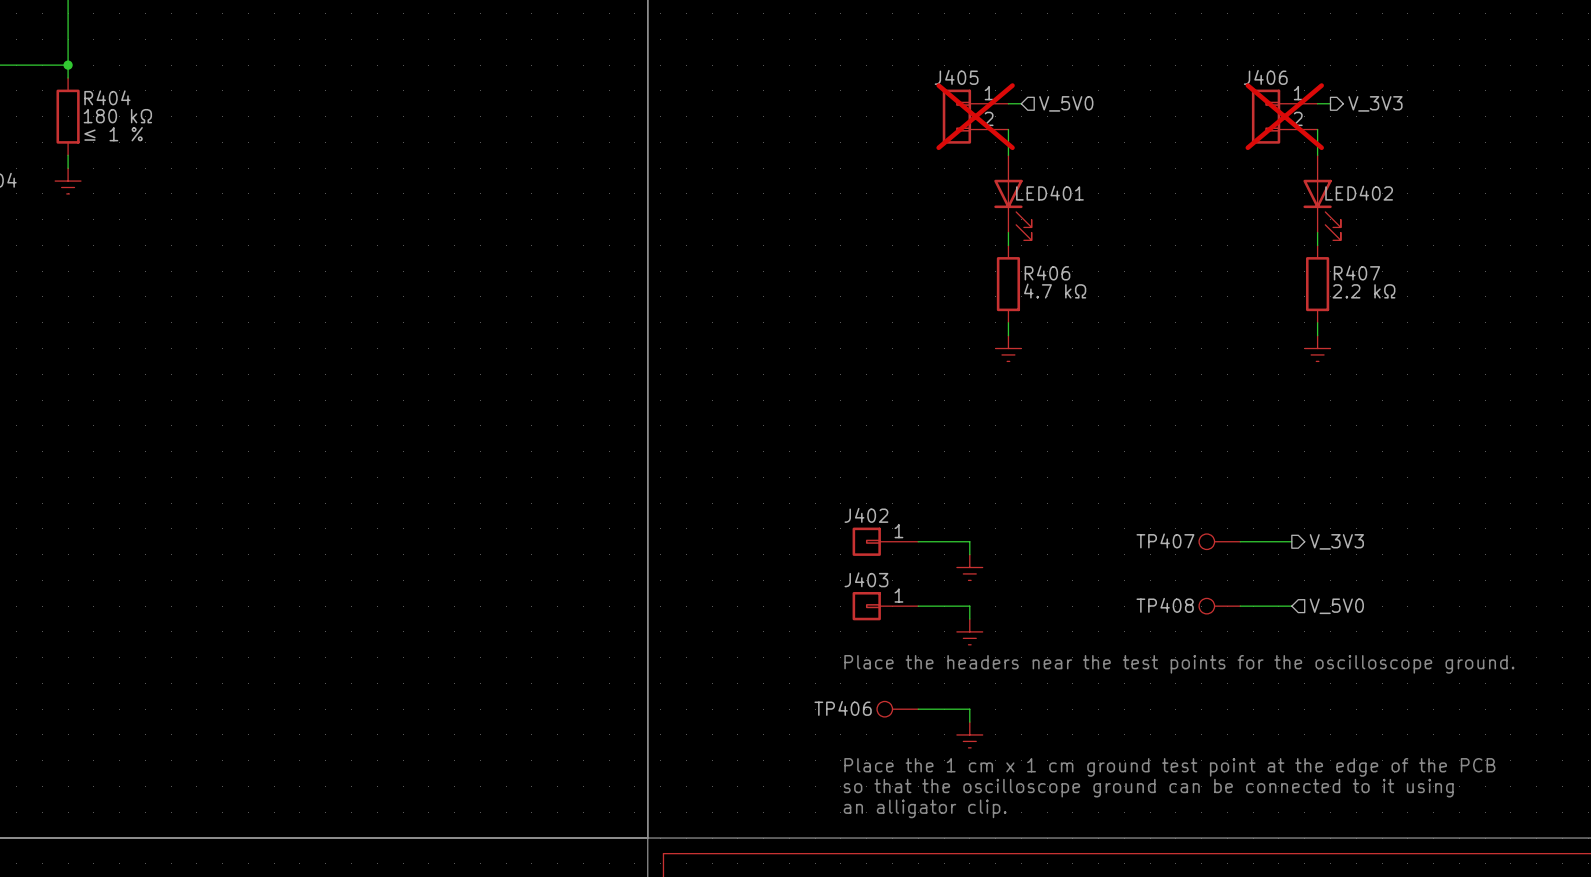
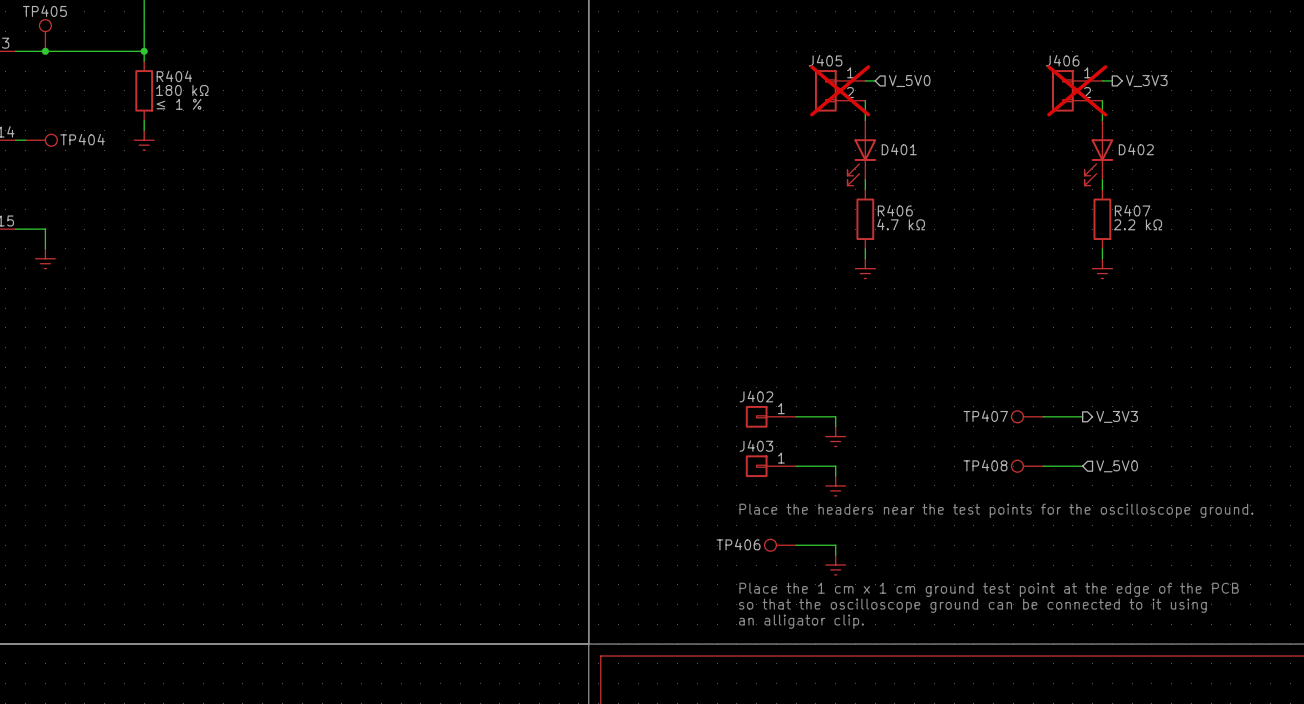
D401: none -> (861, 153)
LED401: (1012, 197) -> none
D402: none -> (1098, 153)
LED402: (1322, 197) -> none

